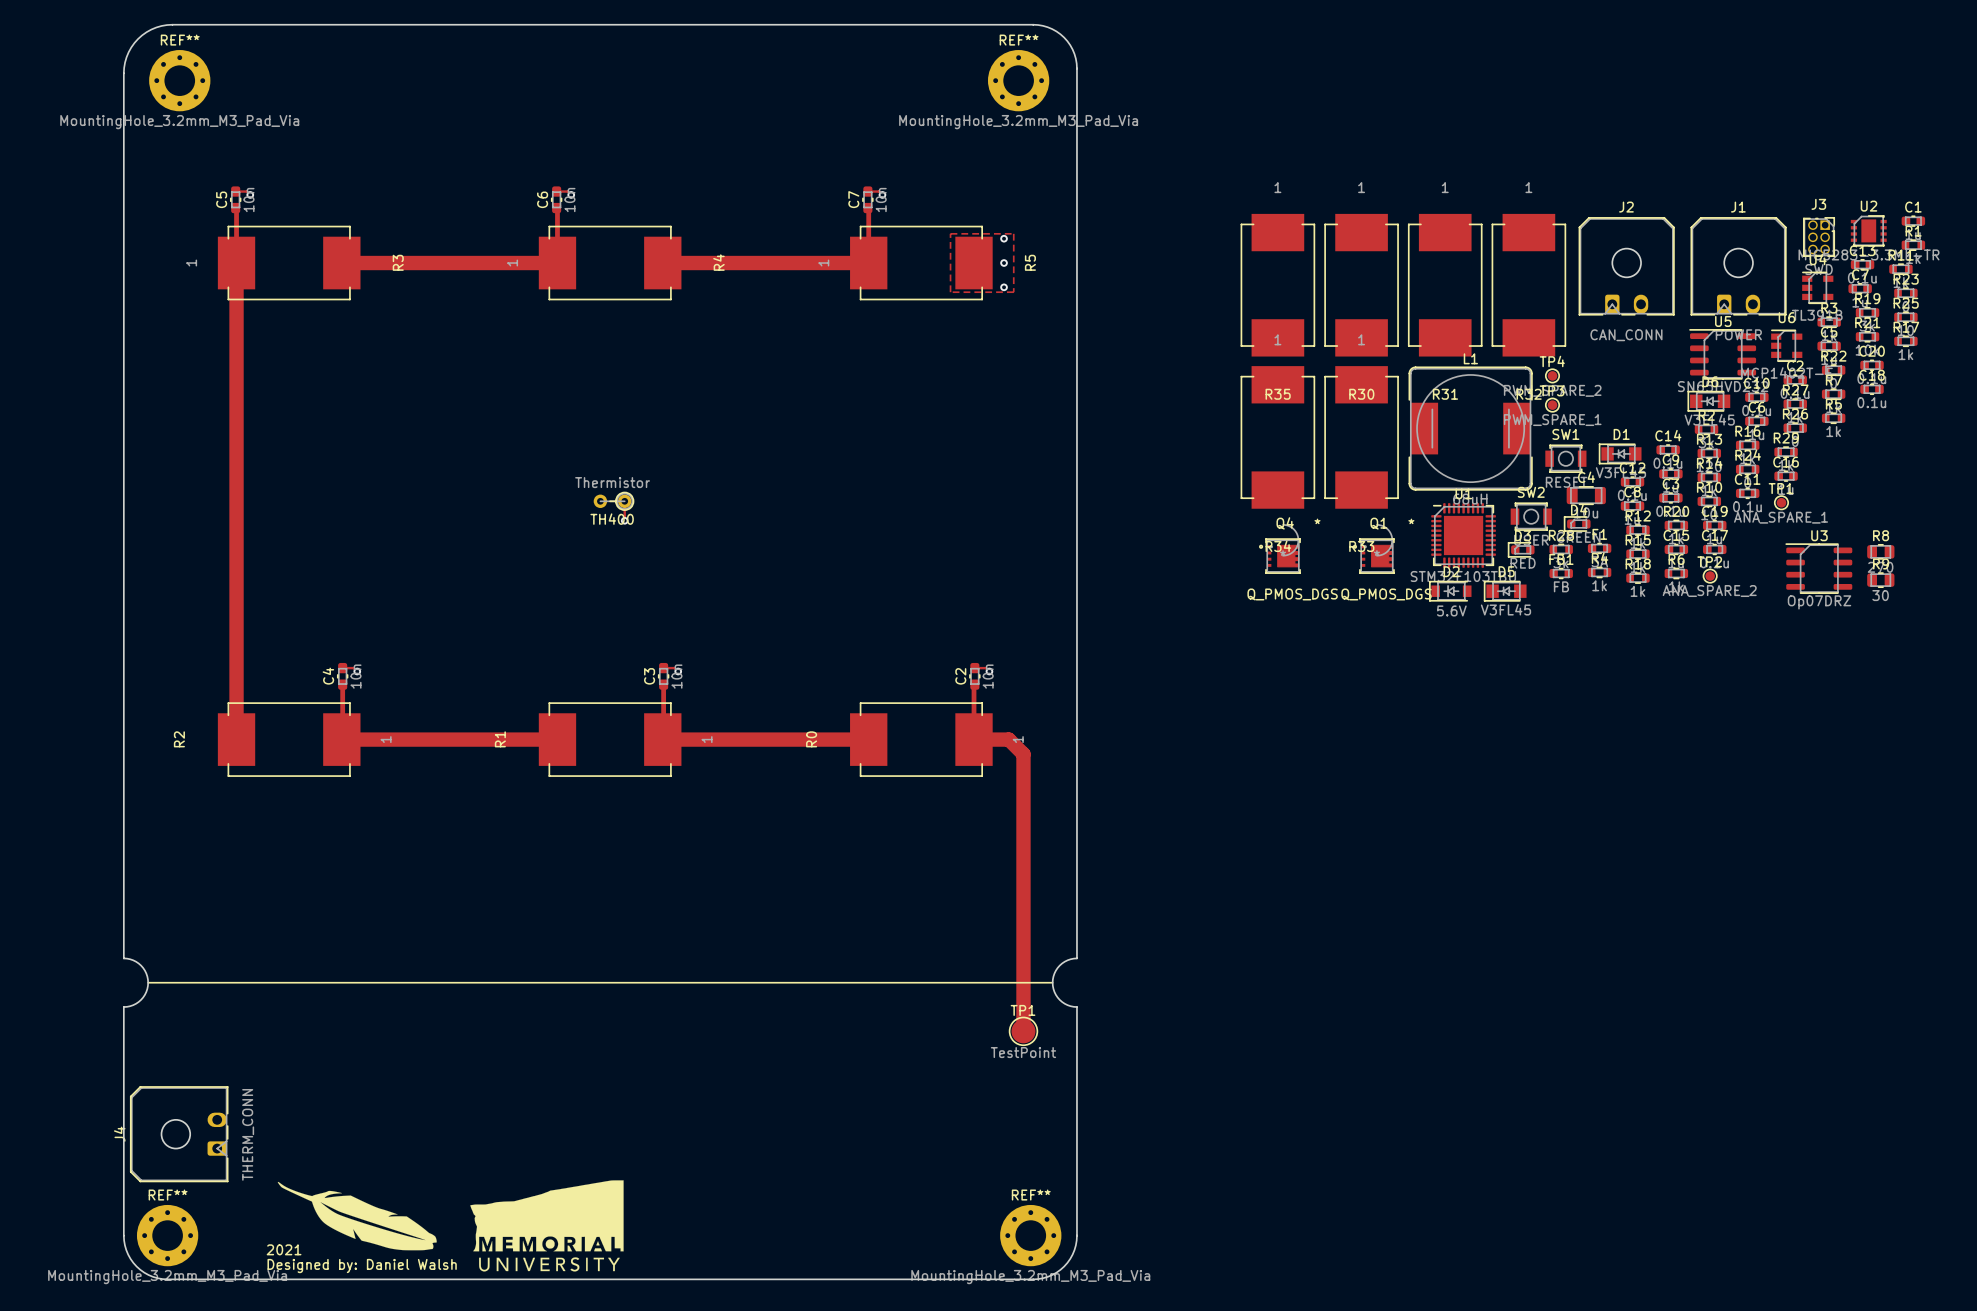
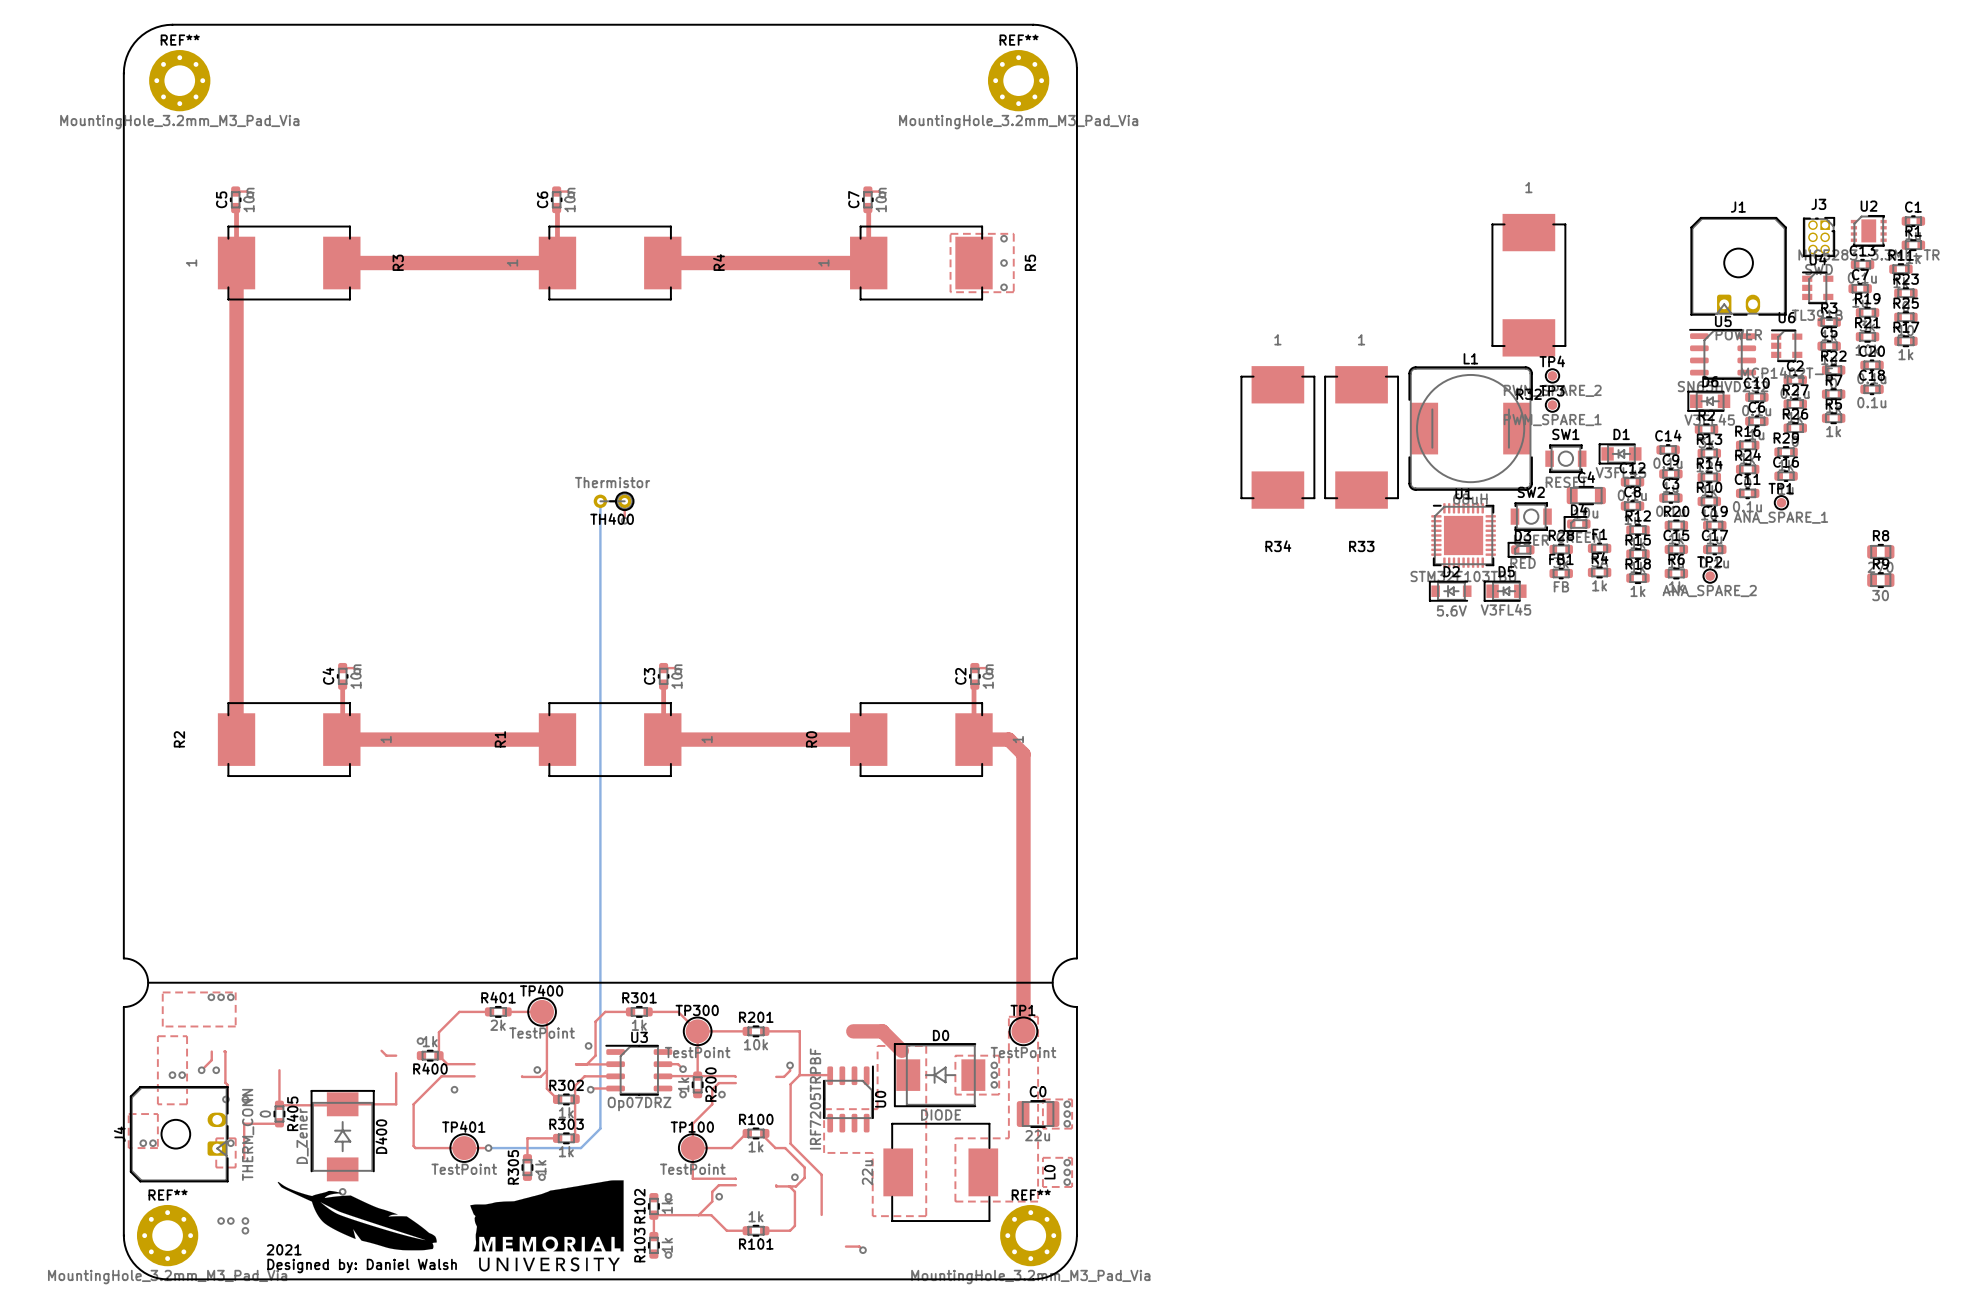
J2: CAN_CONN (1626, 266) -> none
R35: 1 (1277, 285) -> none
R30: 1 (1361, 285) -> none
R31: 1 (1445, 285) -> none
bottom track: none -> (600, 501) (600, 1128) (580, 1148) (488, 1148)
Q4: Q_PMOS_DGS (1279, 549) -> none
Q1: Q_PMOS_DGS (1373, 549) -> none
U3 position: (1818, 568) -> (639, 1070)
top zone outline: none -> (162, 992) (162, 1026) (235, 1026) (235, 992) (162, 992)
via: none -> (211, 997)
via: none -> (221, 997)
via: none -> (230, 997)
top track: none -> (489, 1011) (459, 1011) (438, 1032) (438, 1055) (447, 1064) (474, 1064)
R401: none -> 2k (498, 1011)
top track: none -> (507, 1011) (542, 1011) (546, 1016) (546, 1088) (557, 1099)
TP400: none -> TestPoint (542, 1011)
top track: none -> (630, 1011) (605, 1011) (595, 1021) (595, 1055) (586, 1064)
R301: none -> 1k (639, 1011)
top track: none -> (648, 1011) (678, 1011) (697, 1031)
top zone outline: none -> (1008, 1016) (1008, 1138) (955, 1138) (955, 1201) (1038, 1201) (1038, 1016) (1008, 1016)
top track: none -> (697, 1031) (697, 1076)
top track: none -> (697, 1031) (747, 1031)
TP300: none -> TestPoint (697, 1031)
R201: none -> 10k (756, 1031)
top track: none -> (764, 1031) (799, 1031) (799, 1075)
top track: none -> (853, 1031) (882, 1031) (901, 1050)
top zone outline: none -> (157, 1036) (157, 1104) (187, 1104) (187, 1036) (157, 1036)
via: none -> (420, 1041)
via: none -> (588, 1045)
top zone outline: none -> (877, 1045) (877, 1109) (824, 1109) (824, 1152) (872, 1152) (872, 1216) (926, 1216) (926, 1045) (877, 1045)
top track: none -> (381, 1050) (386, 1055) (396, 1055)
top track: none -> (211, 1051) (211, 1060) (201, 1070)
top track: none -> (224, 1051) (225, 1082) (227, 1084) (225, 1099)
R400: none -> 1k (430, 1055)
top zone outline: none -> (955, 1055) (955, 1094) (999, 1094) (999, 1055) (955, 1055)
top track: none -> (615, 1064) (576, 1064)
top track: none -> (663, 1064) (678, 1064) (683, 1069)
top track: none -> (790, 1065) (790, 1070) (784, 1076) (776, 1076)
via: none -> (790, 1065)
via: none -> (994, 1065)
via: none -> (537, 1069)
via: none -> (683, 1069)
via: none -> (201, 1070)
via: none -> (216, 1070)
top track: none -> (279, 1070) (279, 1105) (396, 1104) (396, 1073)
top track: none -> (546, 1070) (540, 1076) (521, 1076)
via: none -> (172, 1075)
via: none -> (182, 1075)
top track: none -> (799, 1075) (830, 1075)
top track: none -> (799, 1075) (790, 1084) (790, 1143) (821, 1174) (821, 1214)
D0: none -> DIODE (939, 1075)
via: none -> (994, 1075)
top track: none -> (474, 1076) (441, 1076) (413, 1104) (413, 1146) (415, 1148) (488, 1148)
top track: none -> (615, 1076) (584, 1076) (575, 1085) (575, 1138)
top track: none -> (663, 1076) (735, 1076)
top track: none -> (735, 1083) (718, 1083) (712, 1089) (712, 1104) (692, 1123) (692, 1178) (735, 1179)
R200: none -> 1k (697, 1084)
via: none -> (994, 1084)
top track: none -> (615, 1088) (590, 1089)
via: none -> (454, 1089)
via: none -> (590, 1089)
via: none -> (683, 1094)
via: none -> (721, 1094)
via: none -> (225, 1099)
via: none -> (245, 1099)
R302: none -> 1k (566, 1099)
U0: none -> IRF7205TRPBF (848, 1099)
top zone outline: none -> (1042, 1099) (1042, 1128) (1072, 1128) (1072, 1099) (1042, 1099)
via: none -> (1067, 1104)
top zone outline: none -> (128, 1114) (128, 1148) (157, 1148) (157, 1114) (128, 1114)
R405: none -> 0 (279, 1114)
C0: none -> 22u (1038, 1114)
via: none -> (1067, 1114)
top track: none -> (279, 1122) (243, 1123) (244, 1158)
via: none -> (1067, 1123)
top track: none -> (747, 1133) (731, 1148) (692, 1148)
R100: none -> 1k (756, 1133)
top track: none -> (764, 1133) (764, 1137) (775, 1148) (785, 1148) (804, 1167) (804, 1177) (796, 1186) (776, 1185)
D400: none -> D_Zener (342, 1135)
top zone outline: none -> (216, 1138) (235, 1138) (235, 1167) (216, 1167) (216, 1138)
top track: none -> (557, 1138) (527, 1138) (527, 1158)
R303: none -> 1k (566, 1138)
via: none -> (143, 1143)
via: none -> (153, 1143)
via: none -> (230, 1143)
TP401: none -> TestPoint (464, 1148)
via: none -> (488, 1148)
TP100: none -> TestPoint (692, 1148)
top zone outline: none -> (1042, 1157) (1042, 1186) (1072, 1186) (1072, 1157) (1042, 1157)
via: none -> (1067, 1162)
R305: none -> 1k (527, 1167)
L0: none -> 22u (940, 1172)
via: none -> (1067, 1172)
via: none -> (542, 1177)
via: none -> (794, 1177)
via: none -> (1067, 1182)
top track: none -> (735, 1185) (718, 1185) (712, 1191) (712, 1201) (698, 1215)
top track: none -> (789, 1186) (794, 1191) (794, 1225) (790, 1230) (764, 1230)
via: none -> (342, 1191)
via: none -> (668, 1196)
via: none -> (719, 1196)
R102: none -> 1k (653, 1206)
via: none -> (221, 1221)
via: none -> (230, 1221)
via: none -> (245, 1221)
via: none -> (245, 1230)
top track: none -> (747, 1230) (726, 1230) (711, 1215) (653, 1215) (653, 1236)
R101: none -> 1k (756, 1230)
R103: none -> 1k (653, 1245)
top track: none -> (845, 1246) (859, 1246) (863, 1250)
via: none -> (863, 1250)
via: none -> (668, 1255)

